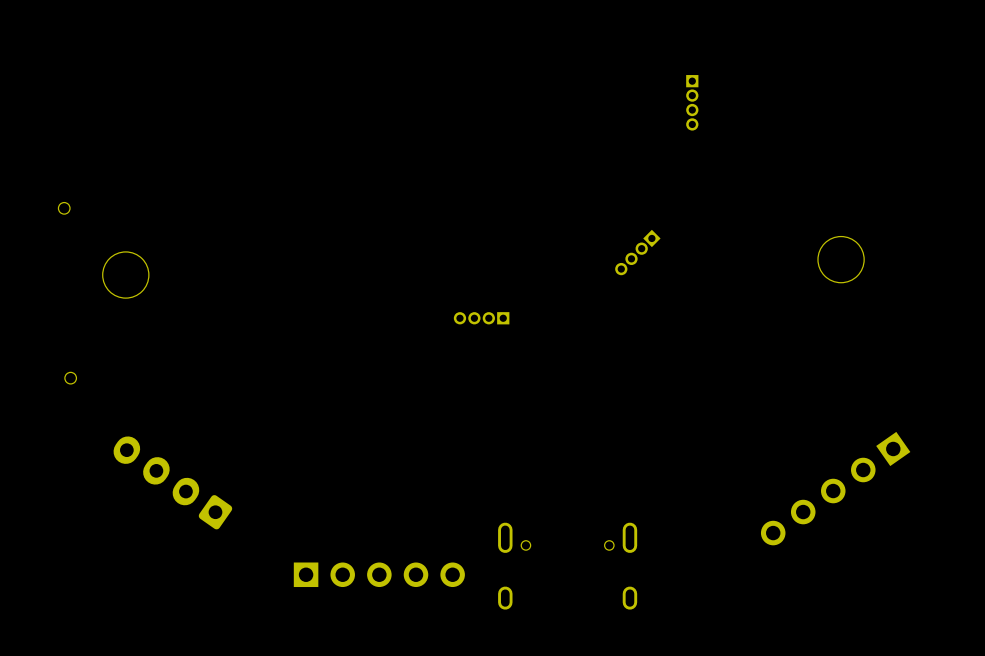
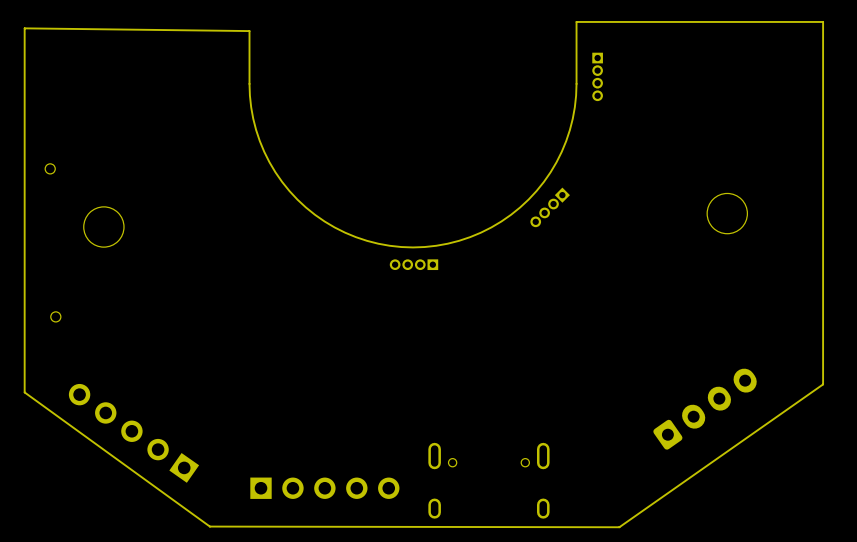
board edge: none -> (823, 21) (576, 21) (576, 95) (572, 118) (561, 151) (543, 181) (520, 207) (501, 221) (480, 232) (447, 243) (413, 247) (389, 245) (366, 240) (334, 227) (305, 207) (282, 181) (264, 151) (253, 118) (249, 95) (249, 31) (24, 28) (24, 392) (209, 526) (619, 527) (823, 384) (823, 21)
part: (172, 482) -> none
part: none -> (705, 409)
part: (835, 488) -> none
part: none -> (134, 433)

